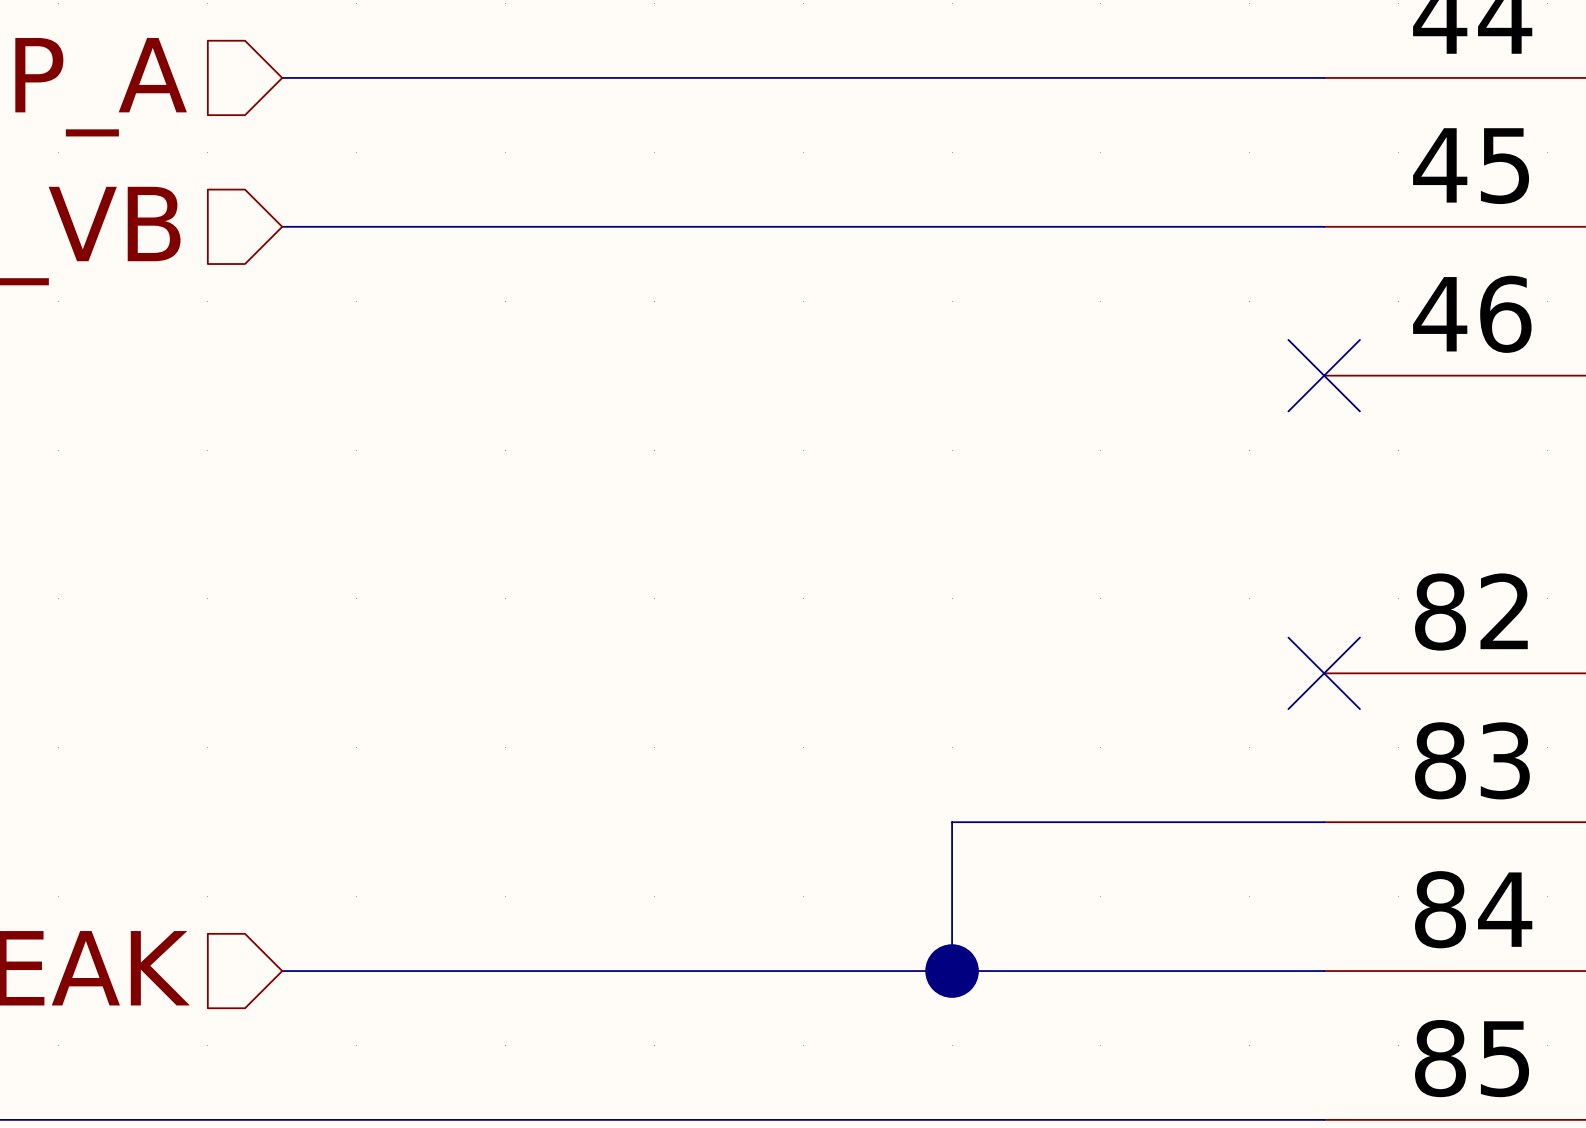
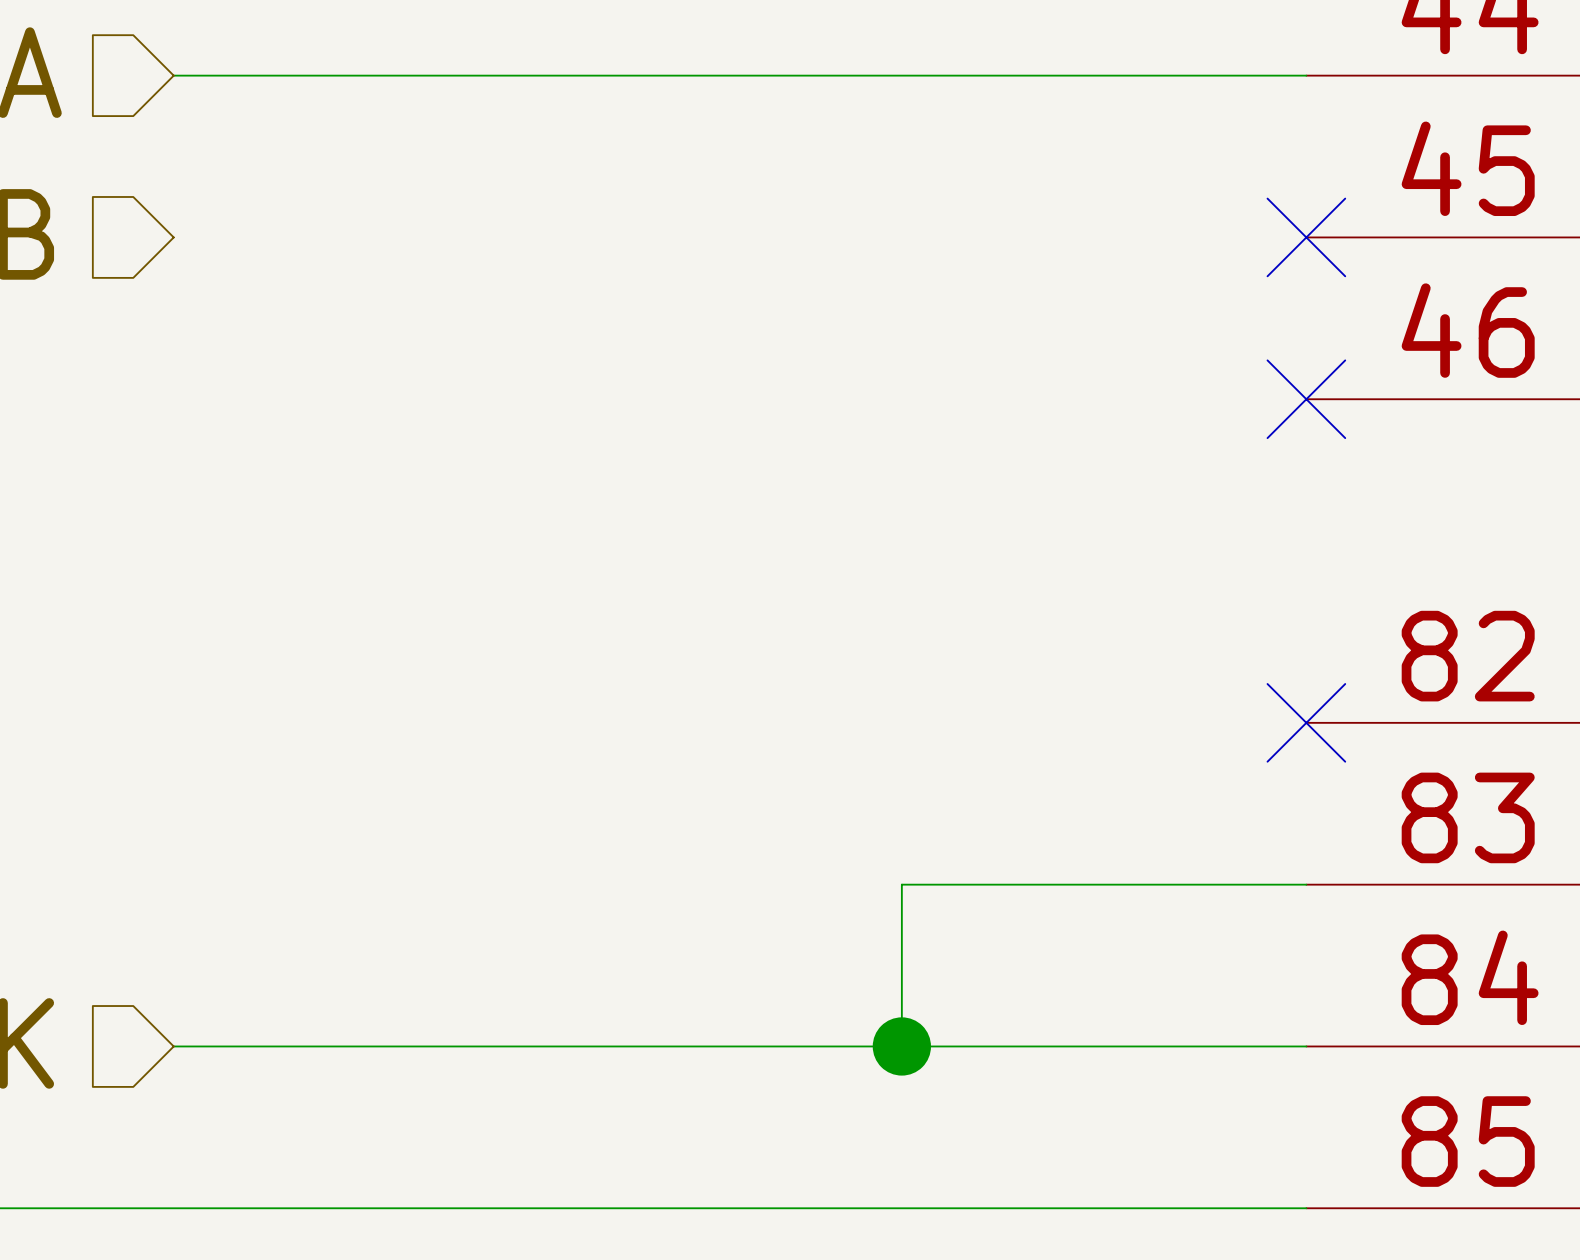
wire: (282, 226) (1324, 226) -> none
no-connect mark: none -> (1306, 237)

